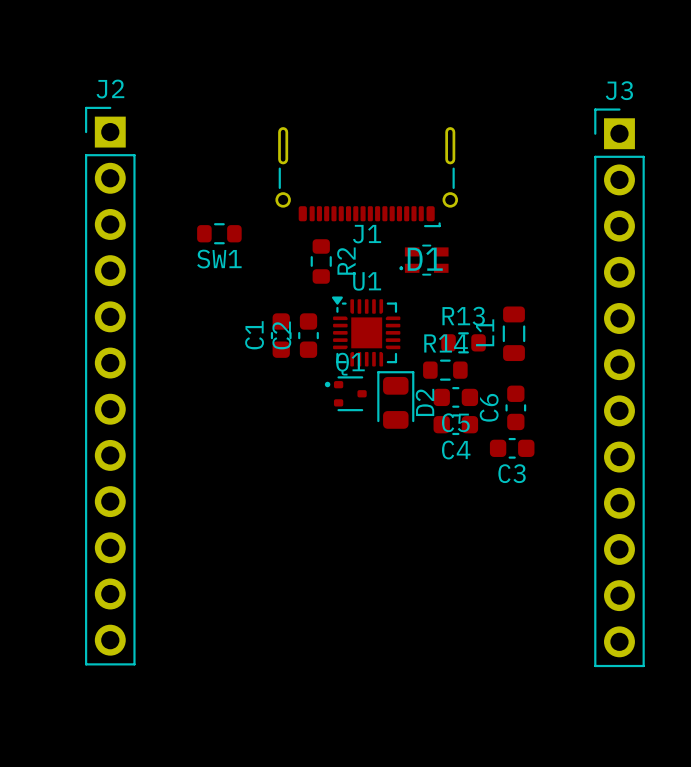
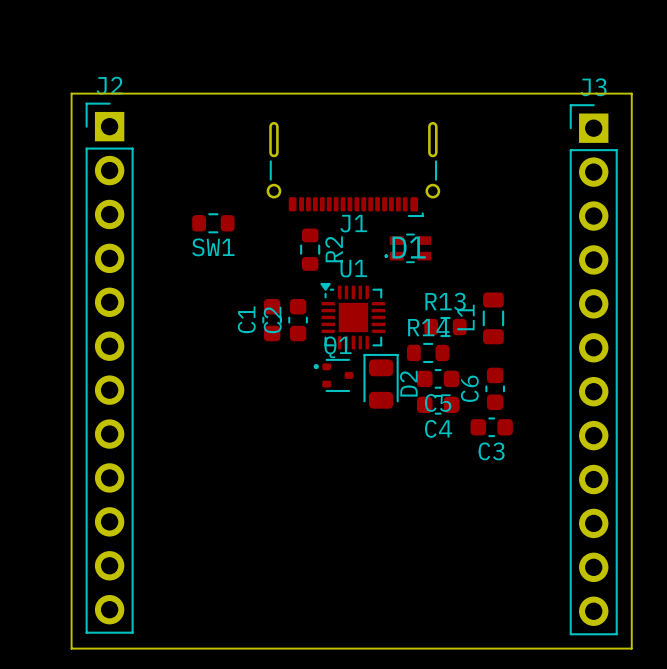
board edge: none -> (71, 93) (631, 93) (631, 648) (71, 648) (71, 93)

